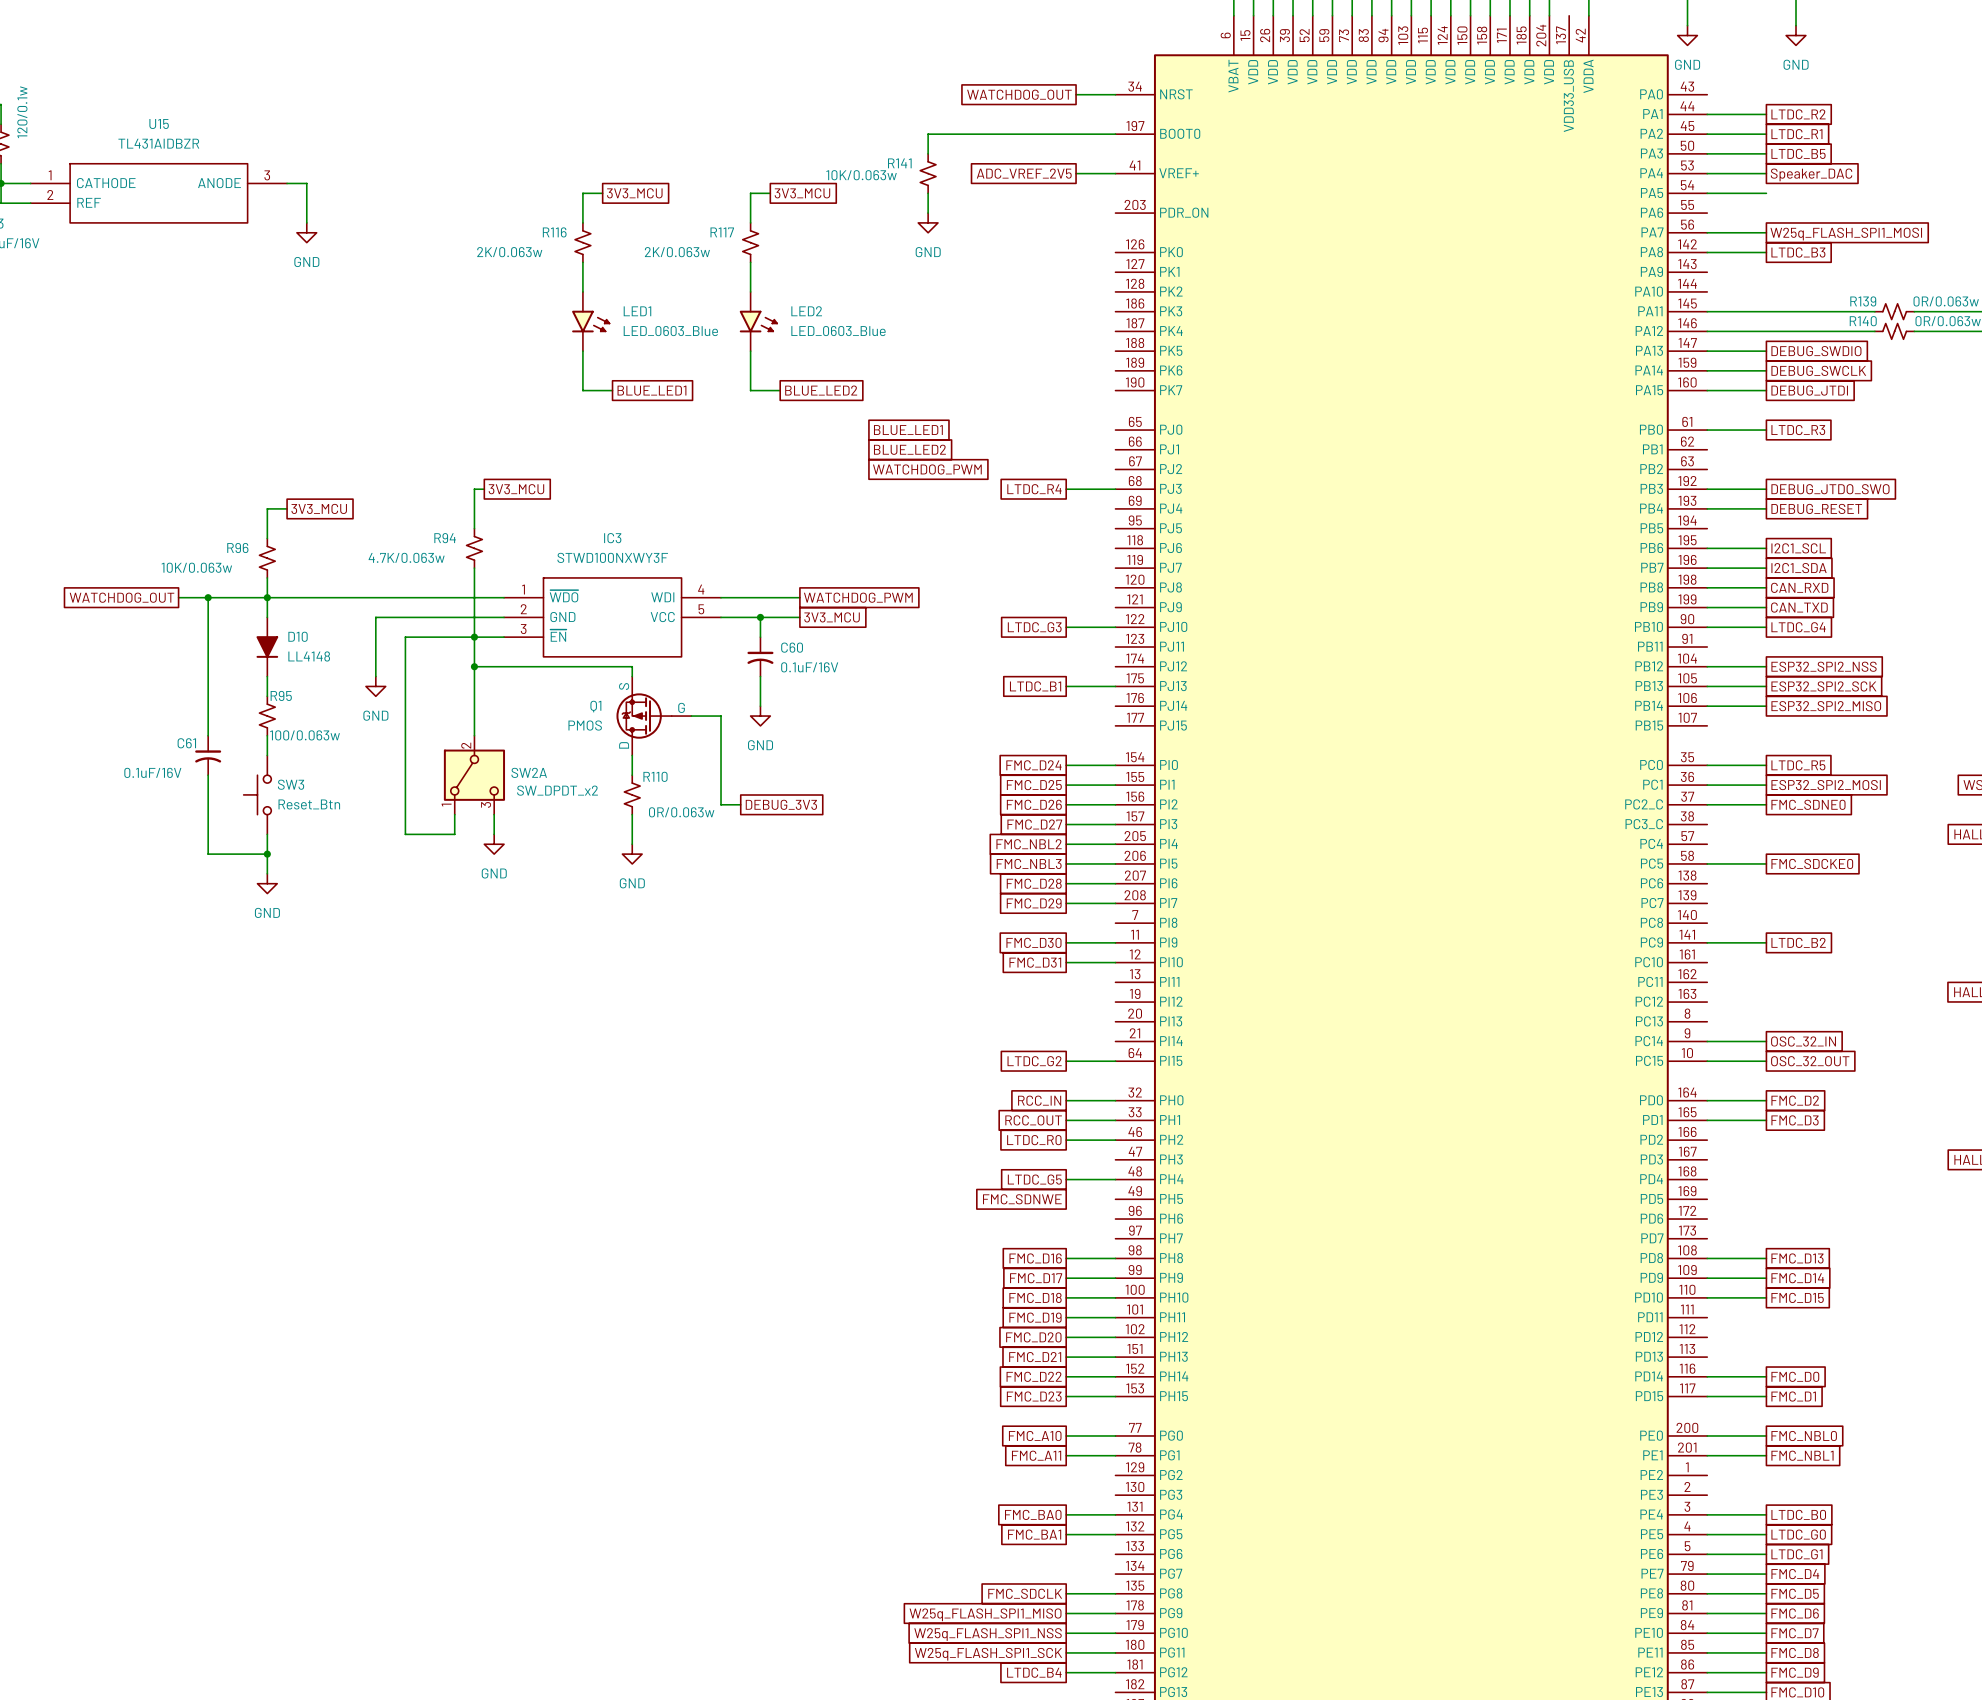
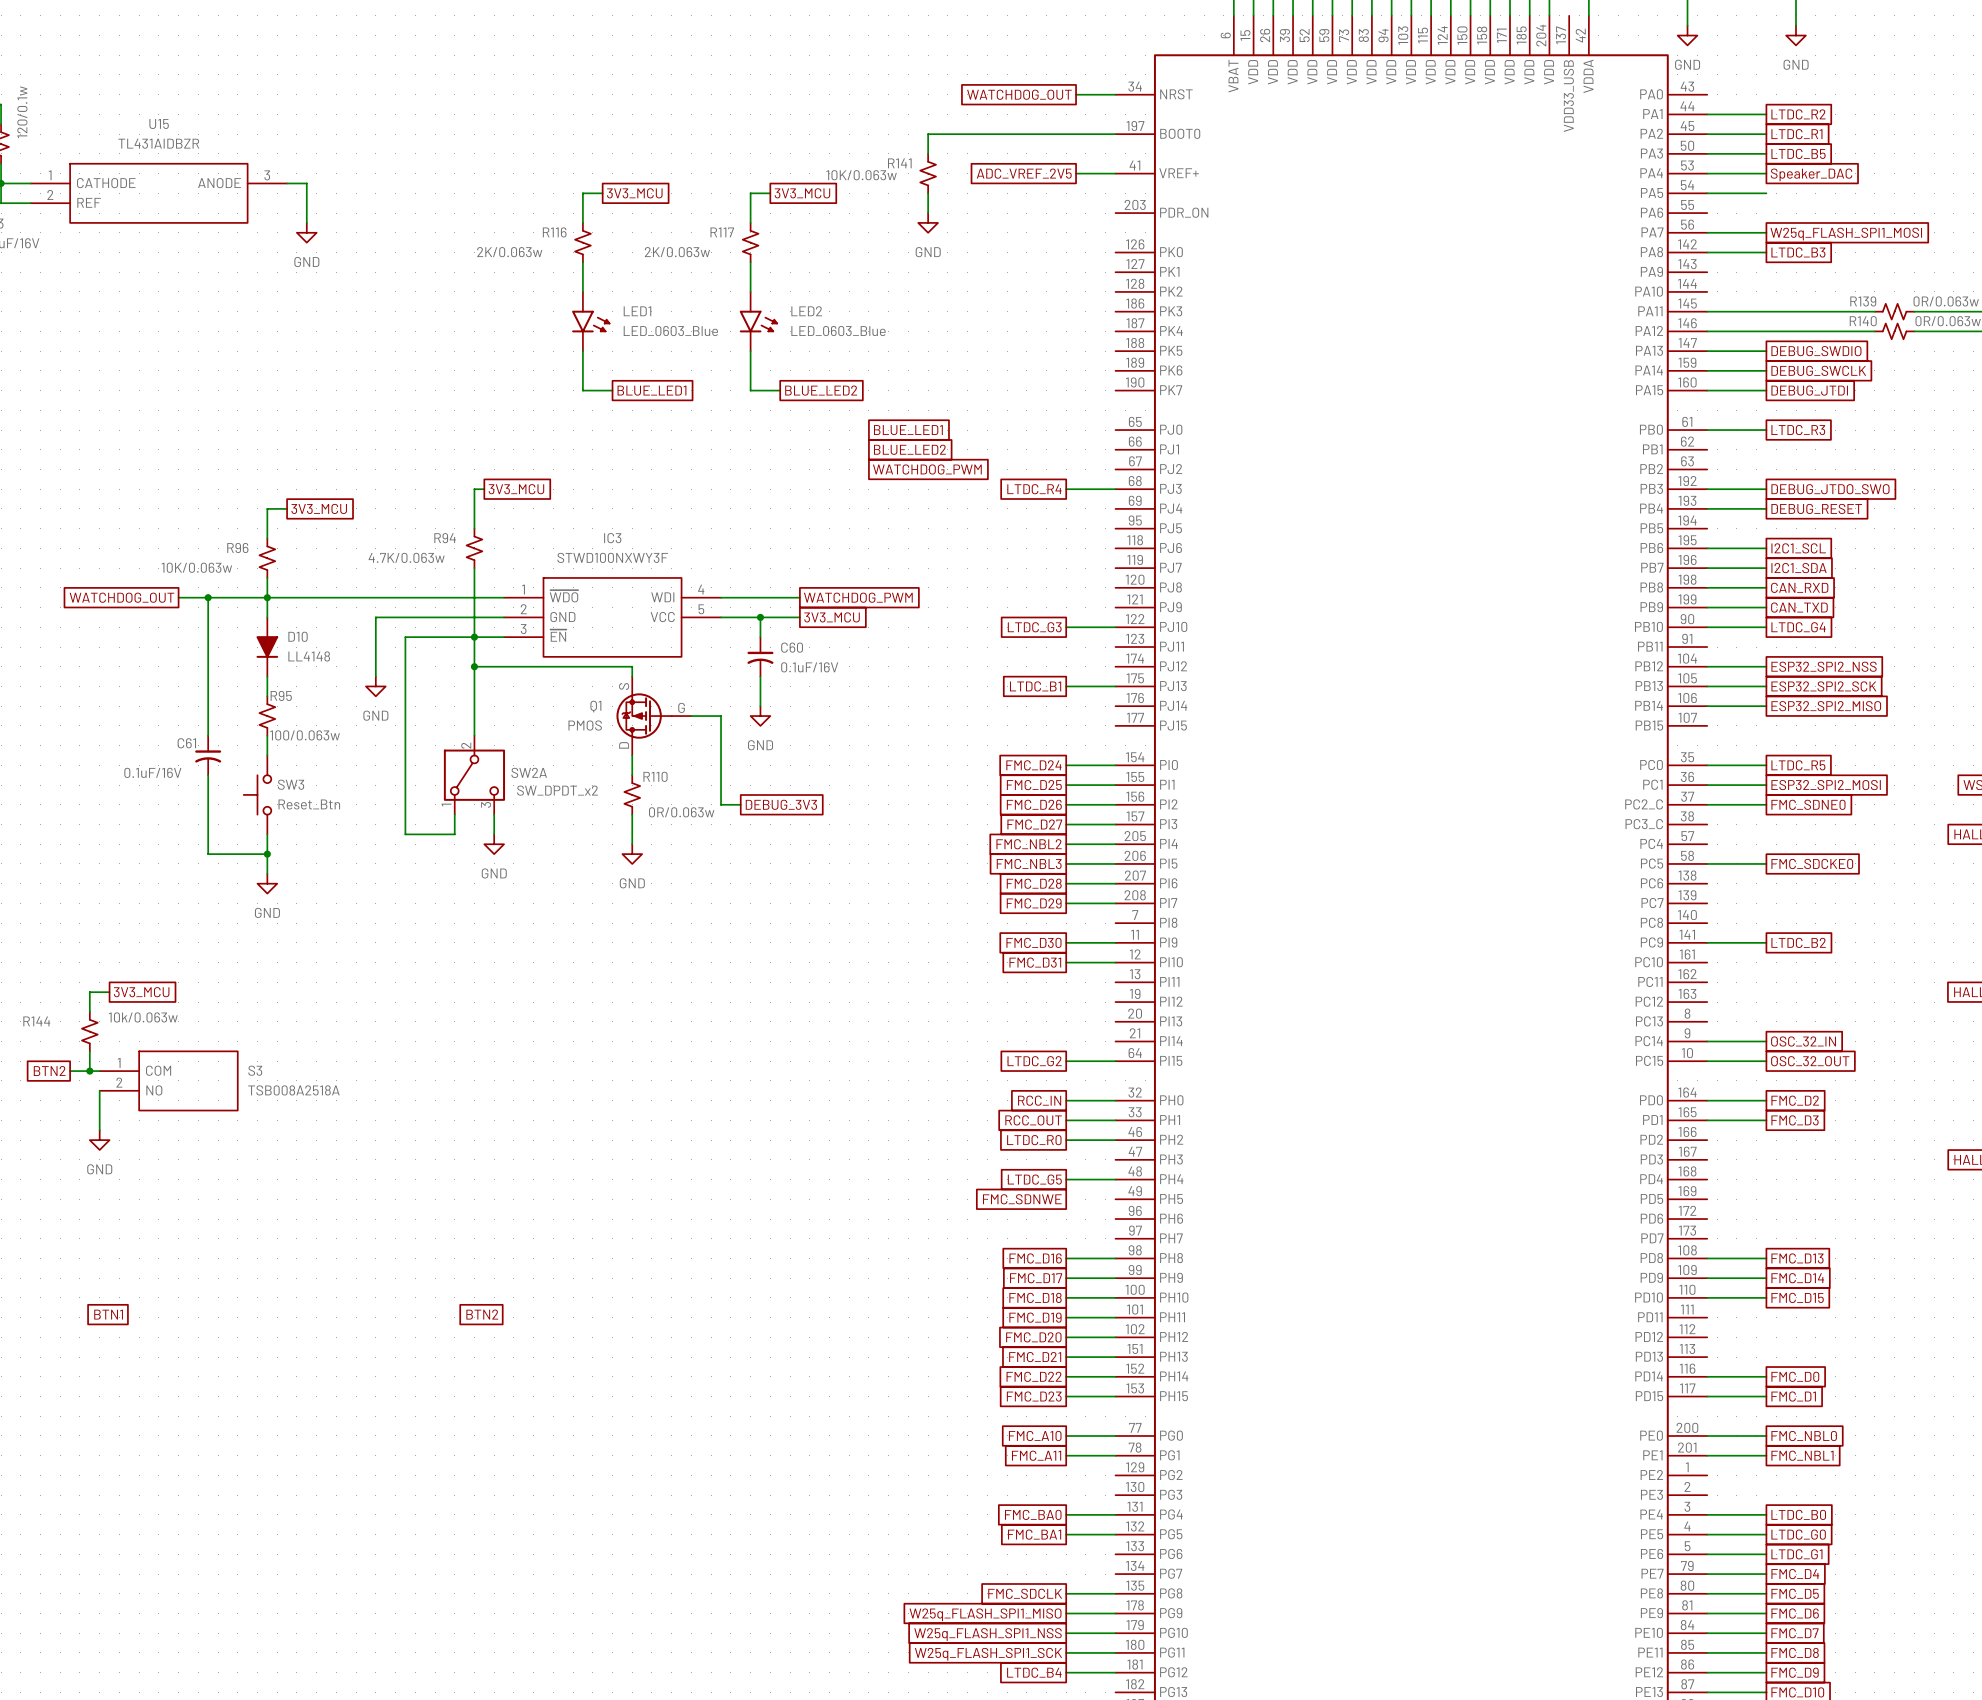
wire: none -> (109, 992) (89, 992) (89, 1011)
global label: none -> 3V3_MCU (141, 992)
R144: none -> 10k/0.063w (89, 1031)
wire: none -> (89, 1051) (89, 1071)
global label: none -> BTN2 (49, 1071)
wire: none -> (70, 1071) (99, 1071)
junction: none -> (89, 1071)
S3: none -> TSB008A2518A (169, 1080)
wire: none -> (99, 1090) (99, 1130)
power symbol: none -> GND (99, 1140)
global label: none -> BTN1 (108, 1314)
global label: none -> BTN2 (482, 1314)

